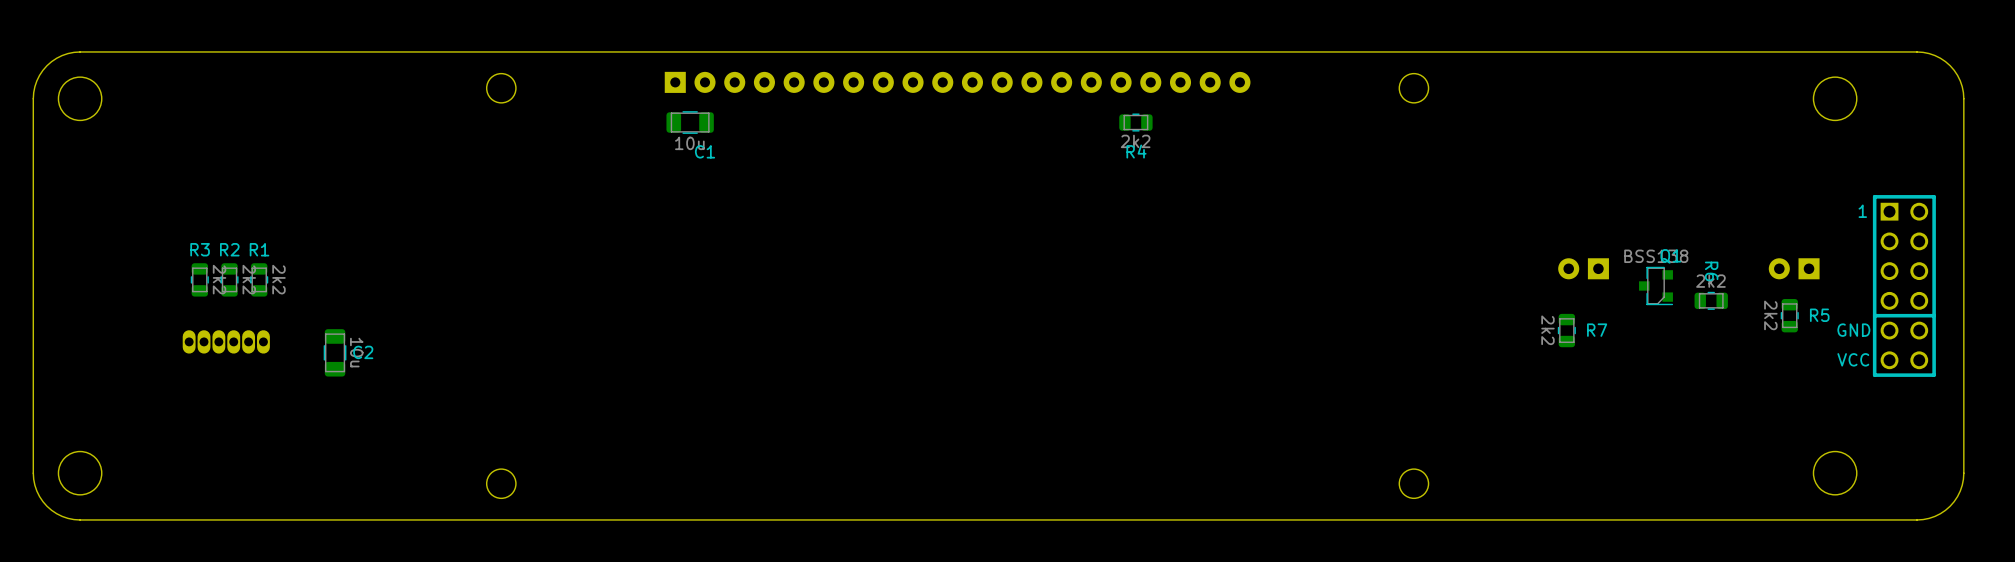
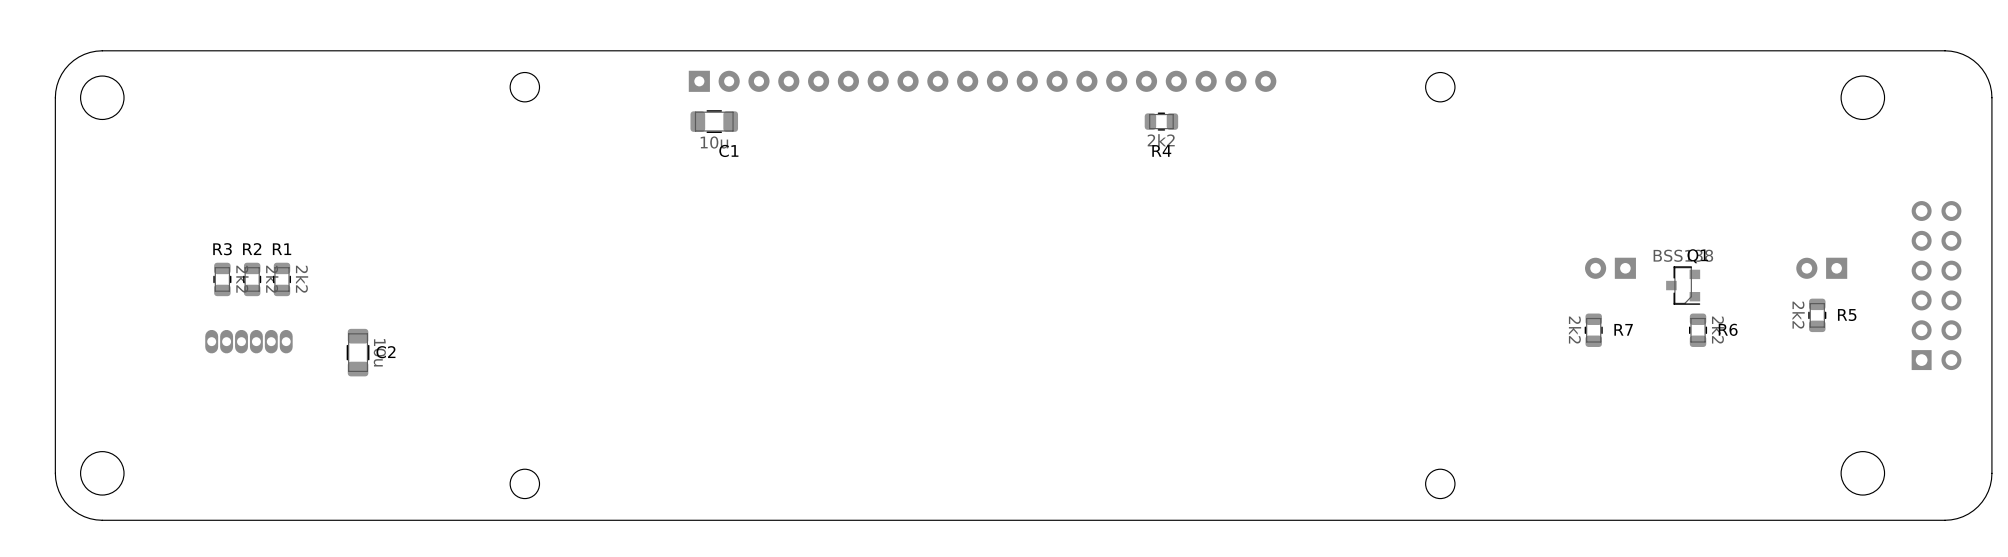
part footprint: [1872, 195, 1936, 377] -> [1911, 201, 1962, 371]
R6 rotation: 0° (1711, 300) -> 90° clockwise (1698, 330)
R6 position: (1711, 300) -> (1698, 330)

